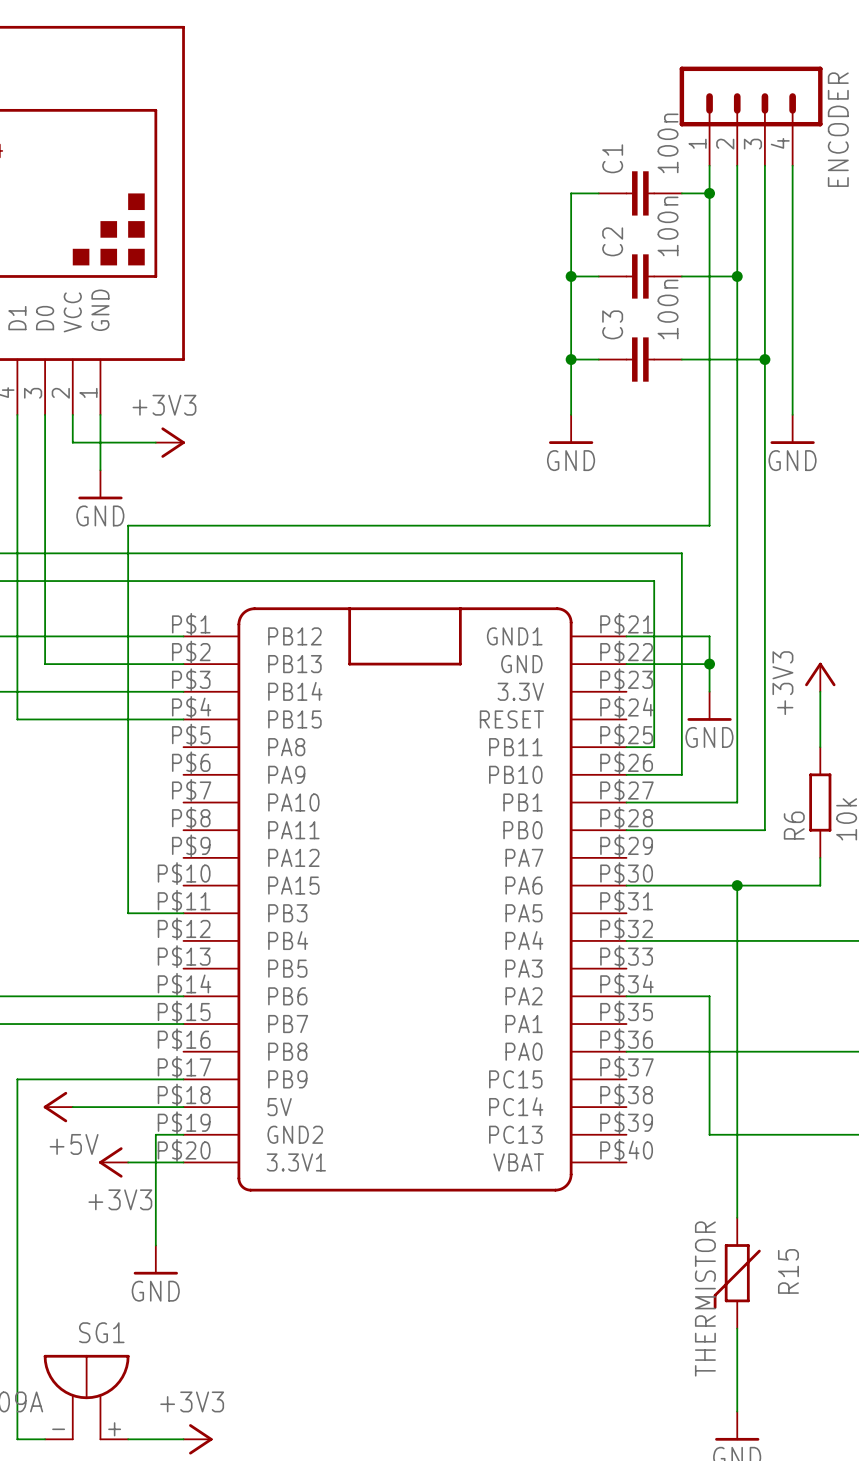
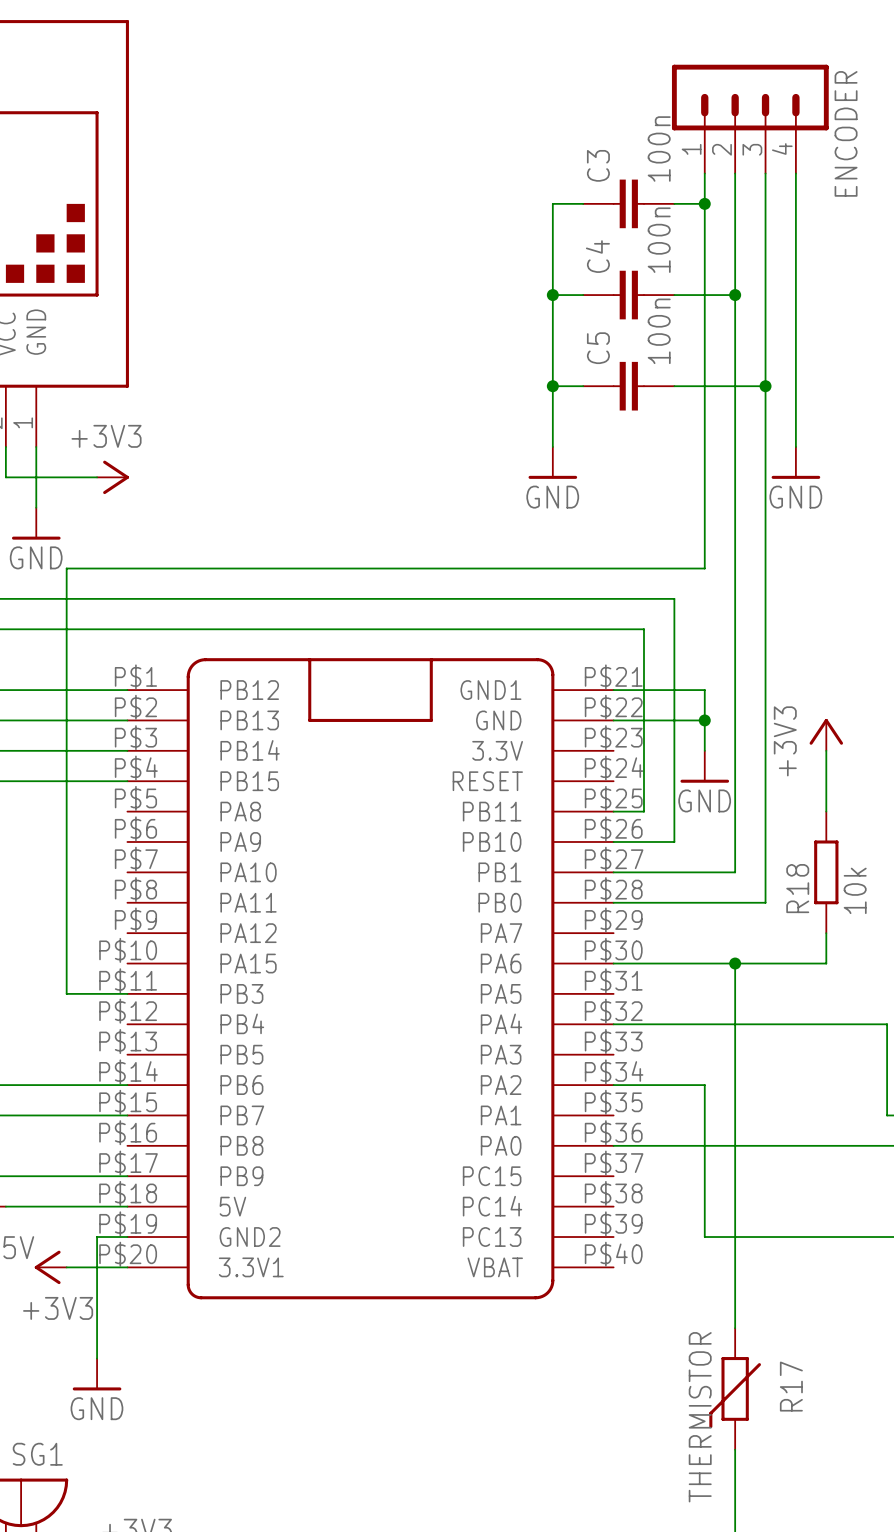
C1 name: C1 (612, 158) -> C3 (598, 165)
C2 name: C2 (612, 241) -> C4 (597, 256)
C3 name: C3 (612, 324) -> C5 (598, 348)
R6 name: R6 (794, 825) -> R18 (797, 888)
R15 name: R15 (788, 1271) -> R17 (791, 1386)

